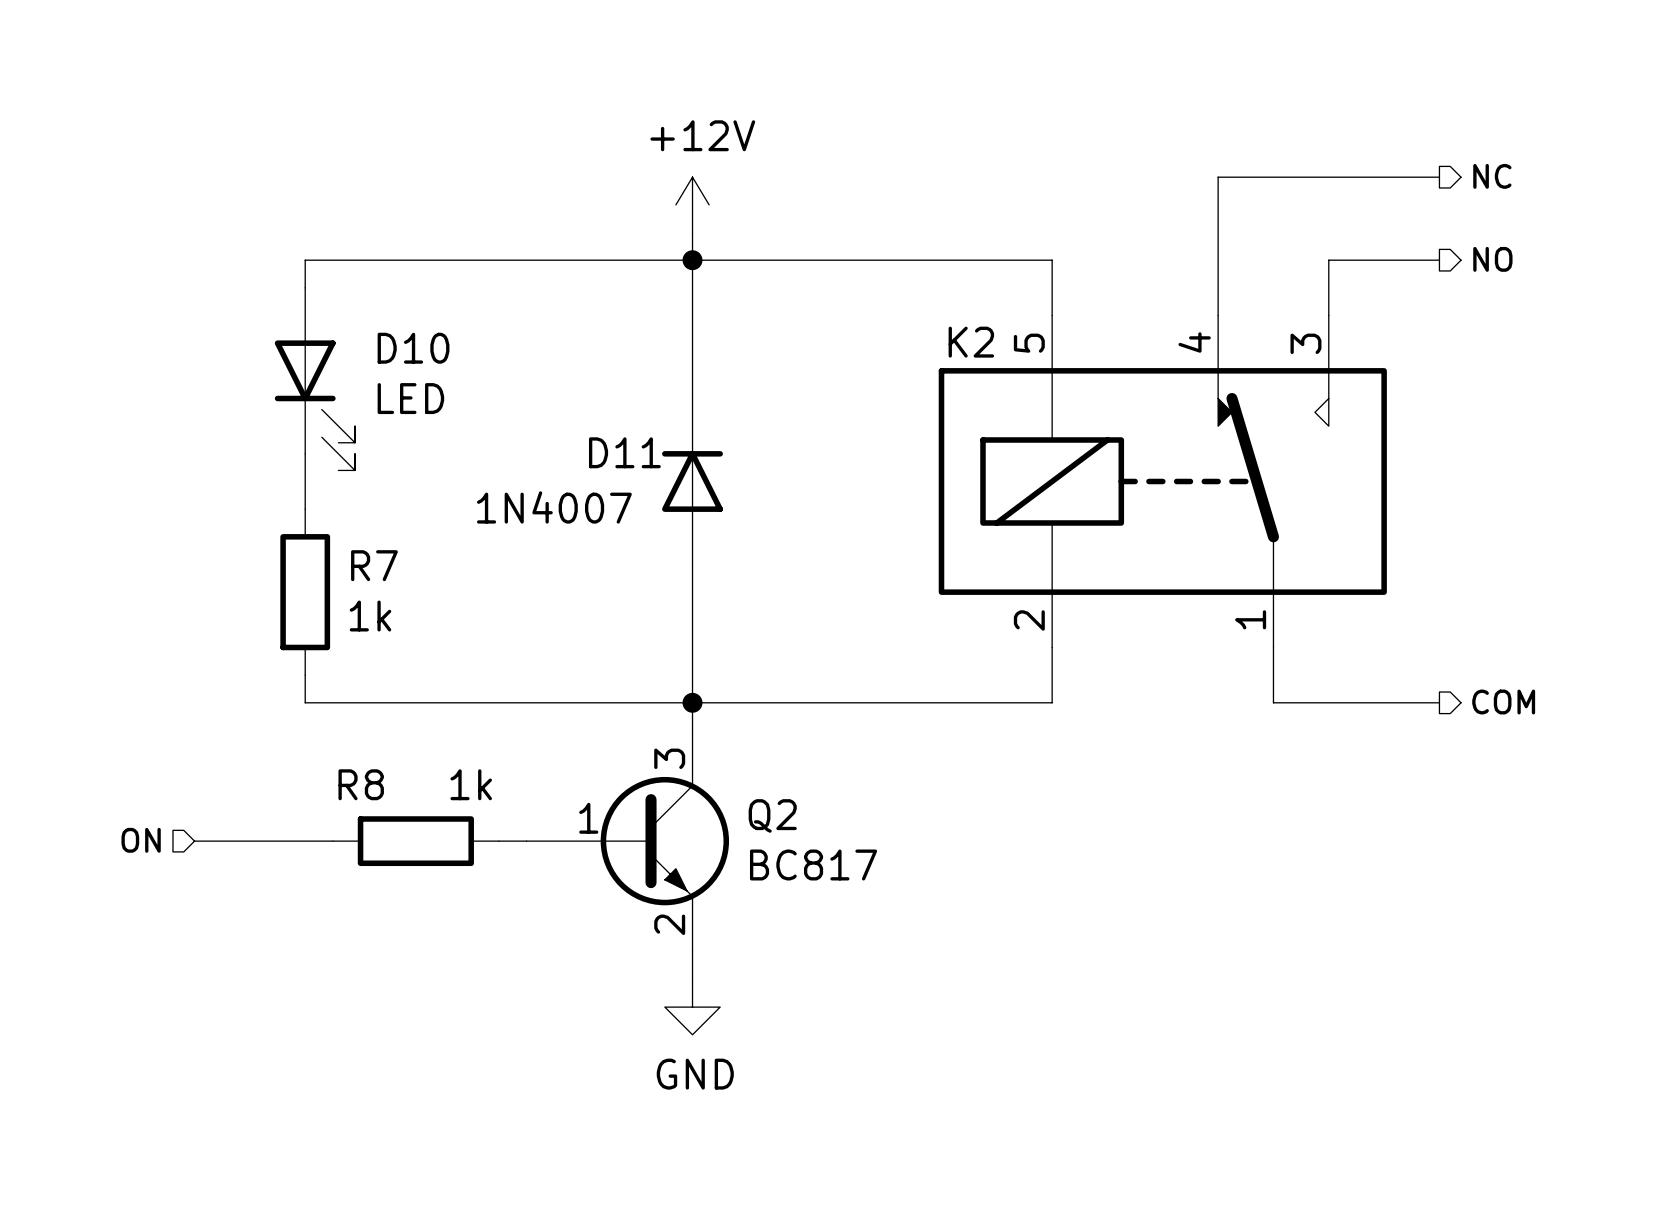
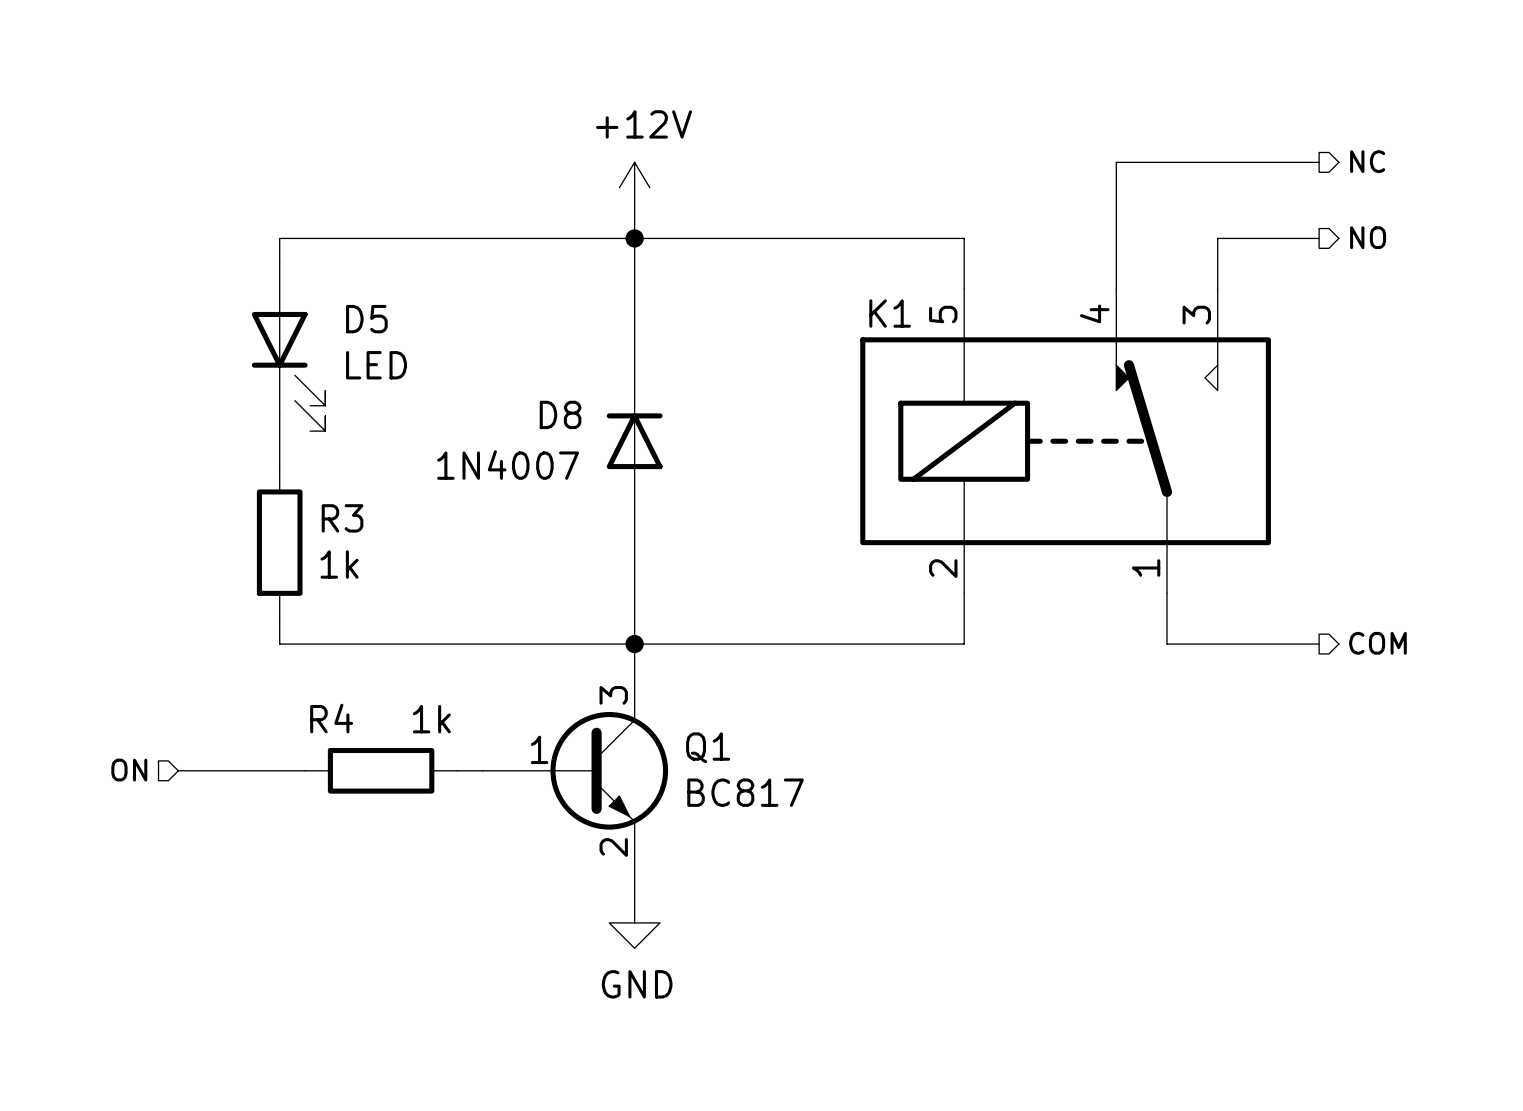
K2 name: K2 (971, 342) -> K1 (890, 313)
D10 name: D10 (413, 348) -> D5 (366, 319)
D11 name: D11 (624, 452) -> D8 (560, 414)
R7 name: R7 (374, 565) -> R3 (342, 518)
R8 name: R8 (361, 784) -> R4 (331, 718)
Q2 name: Q2 (772, 815) -> Q1 (708, 747)

